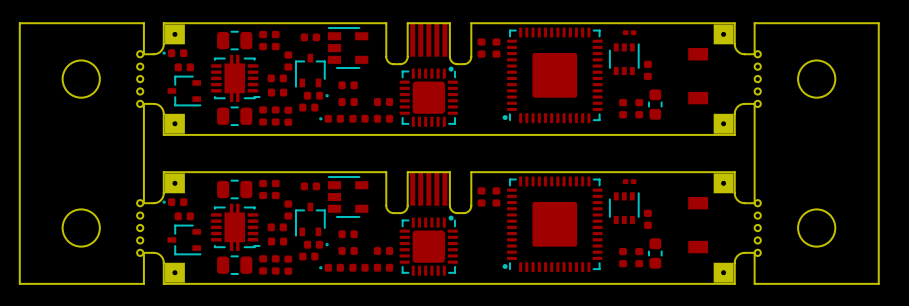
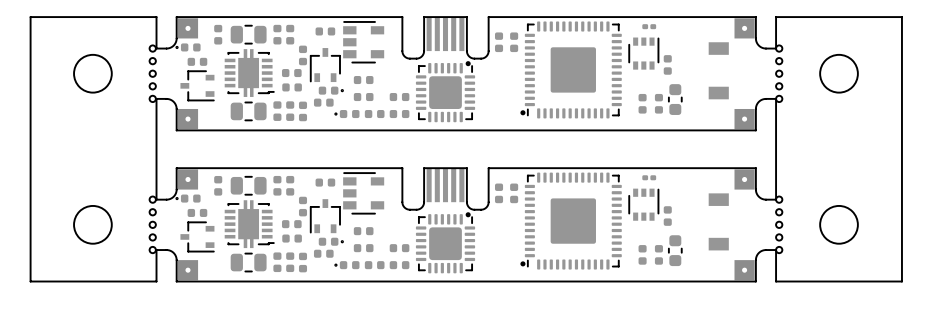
part: none -> (218, 34)
part: none -> (218, 185)

